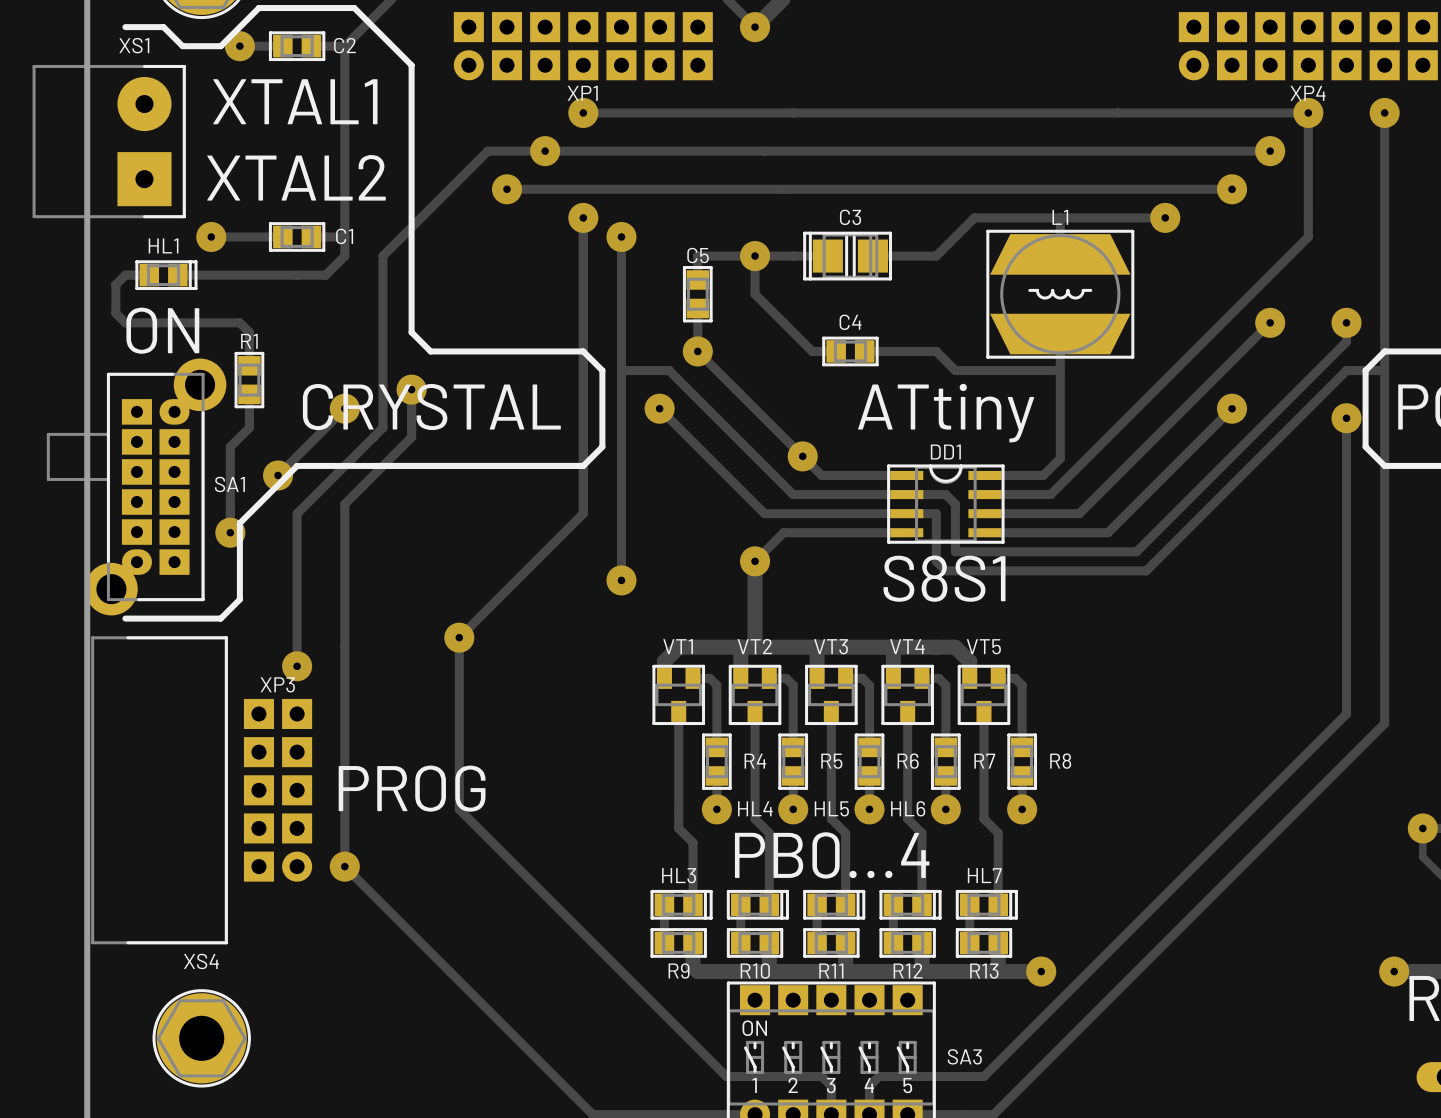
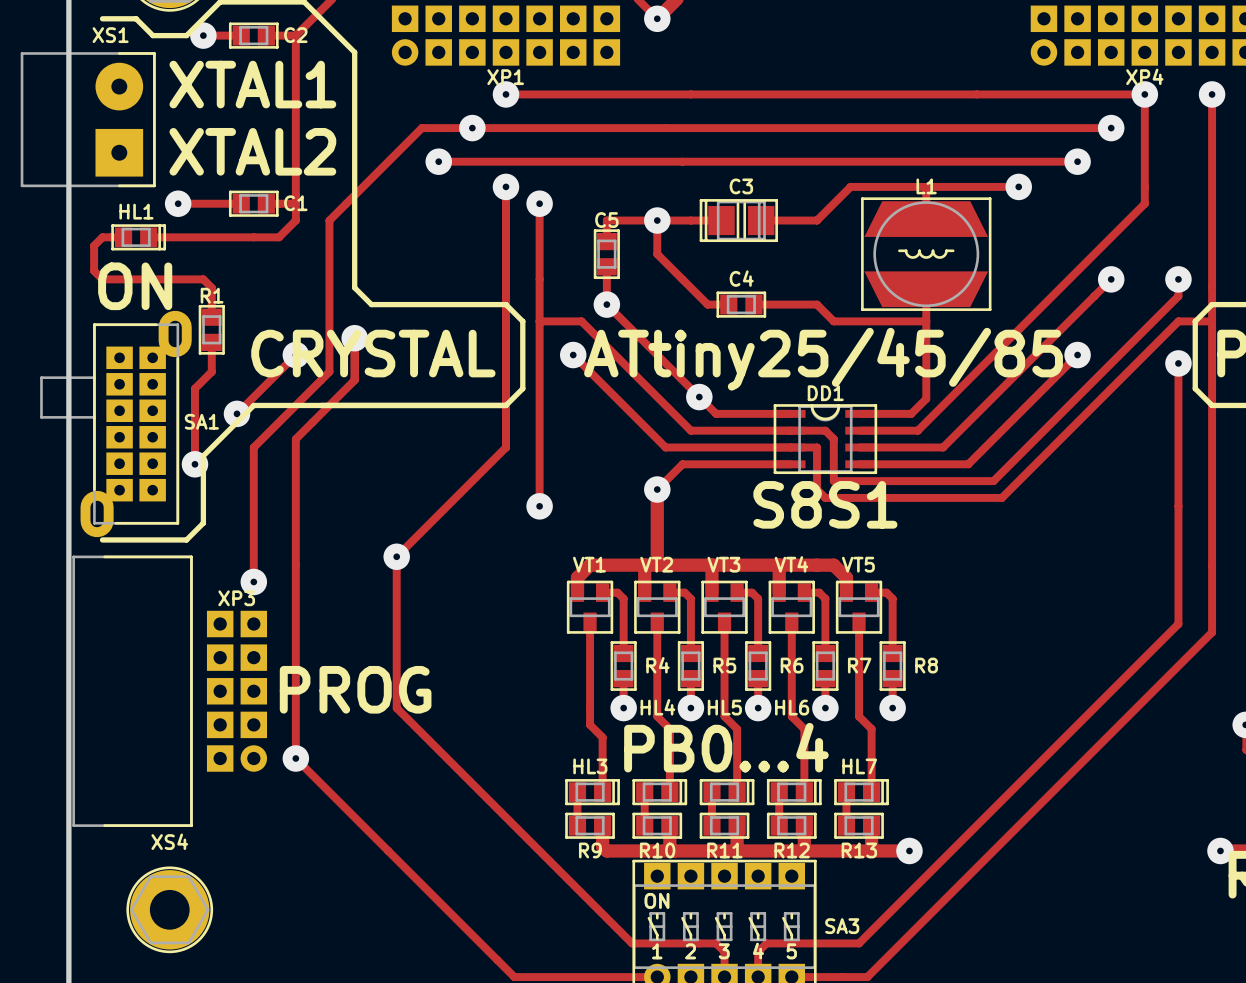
SA1 footprint: [46, 358, 227, 616] -> [40, 310, 192, 538]
text: ATtiny (946, 413) -> ATtiny25/45/85 (823, 359)

